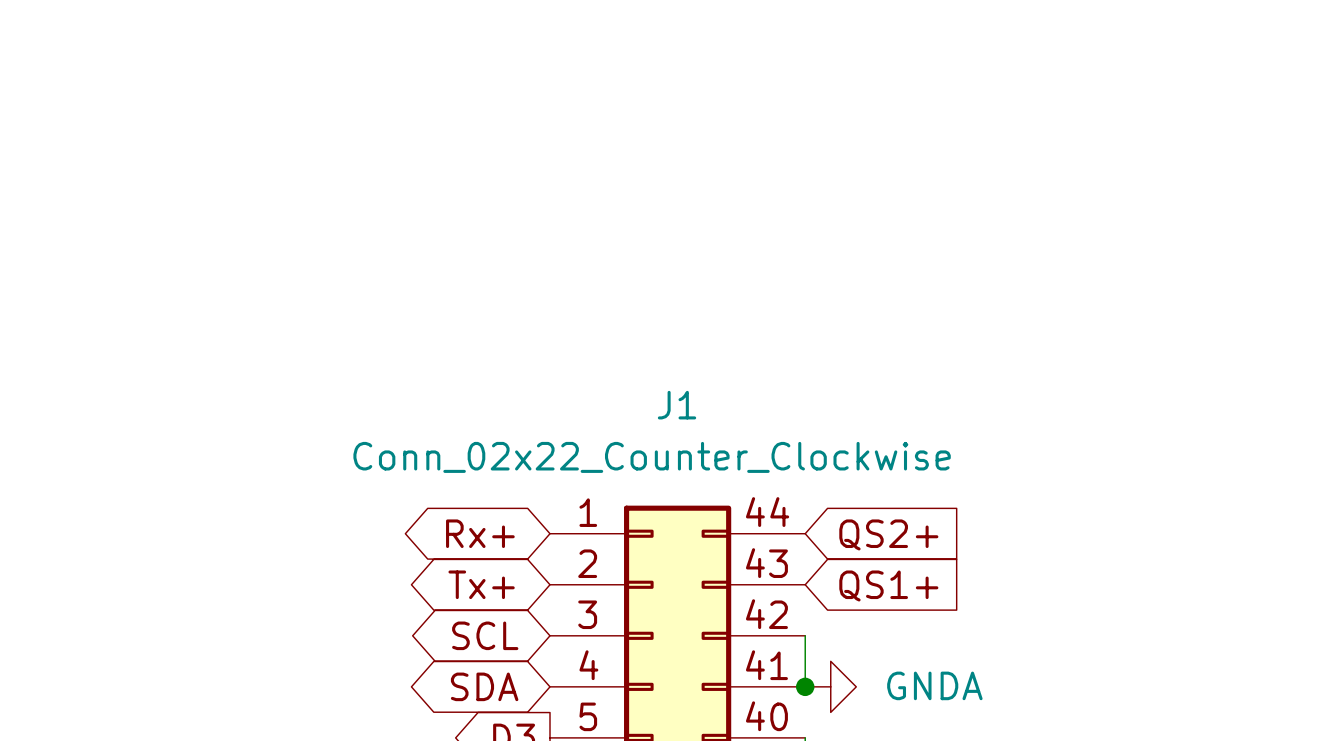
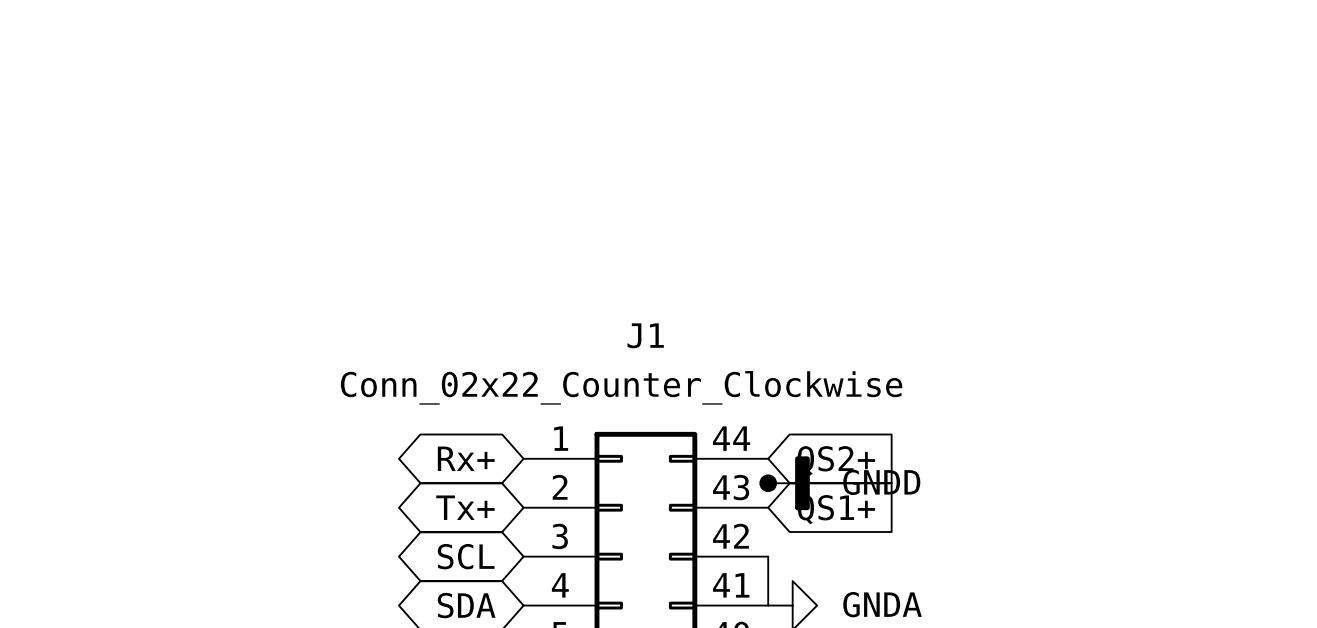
junction: none -> (768, 483)
power symbol: none -> GNDD (789, 483)
junction: (805, 686) -> none

